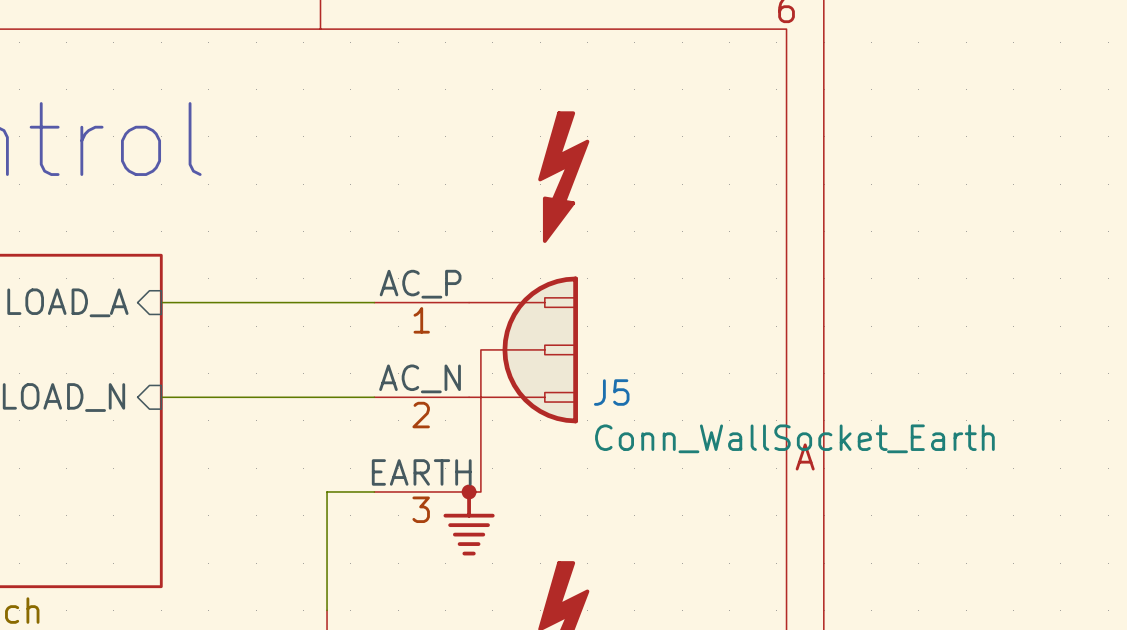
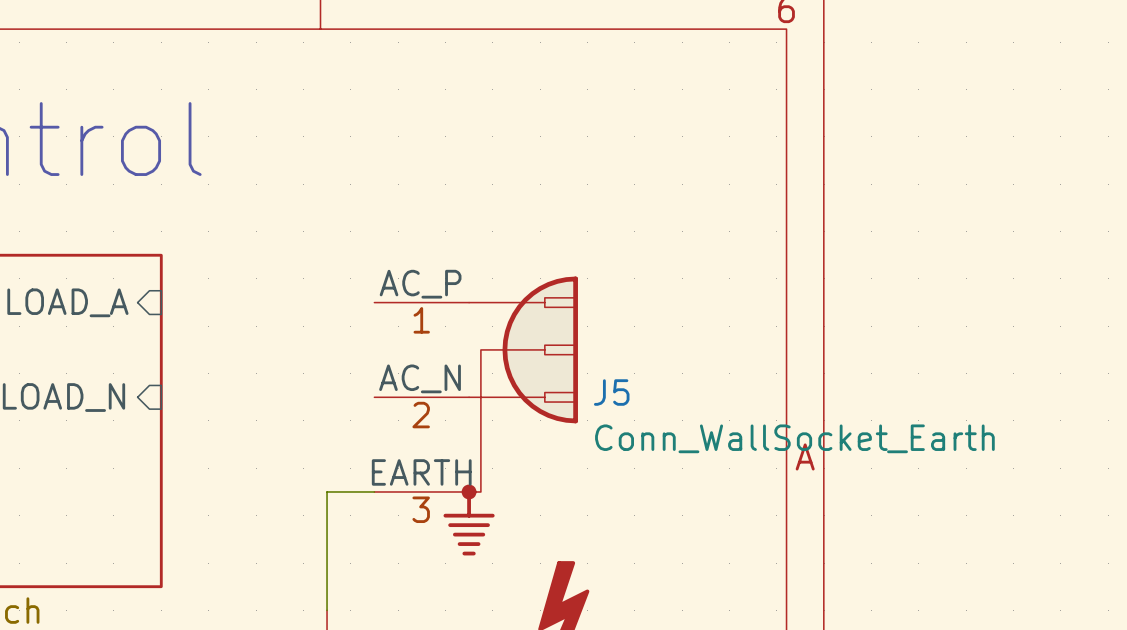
power symbol: (563, 177) -> none
wire: (161, 302) (374, 302) -> none
wire: (161, 397) (374, 397) -> none

